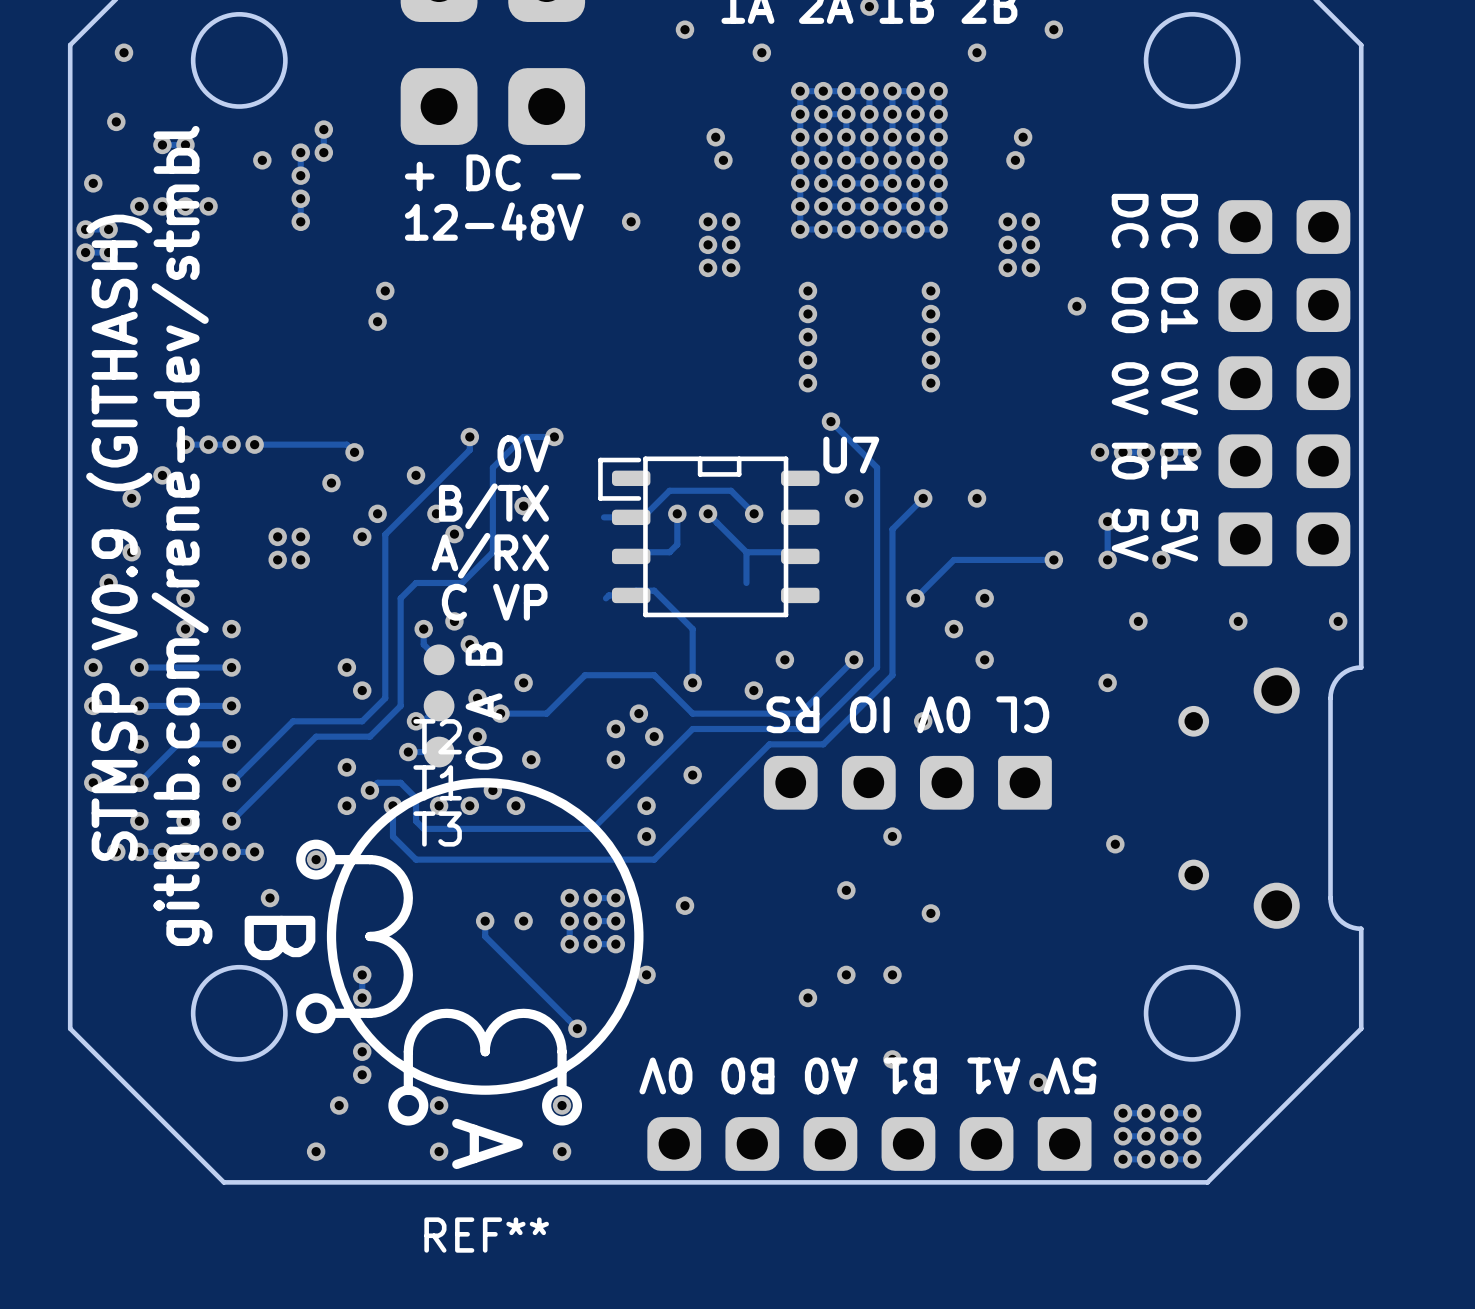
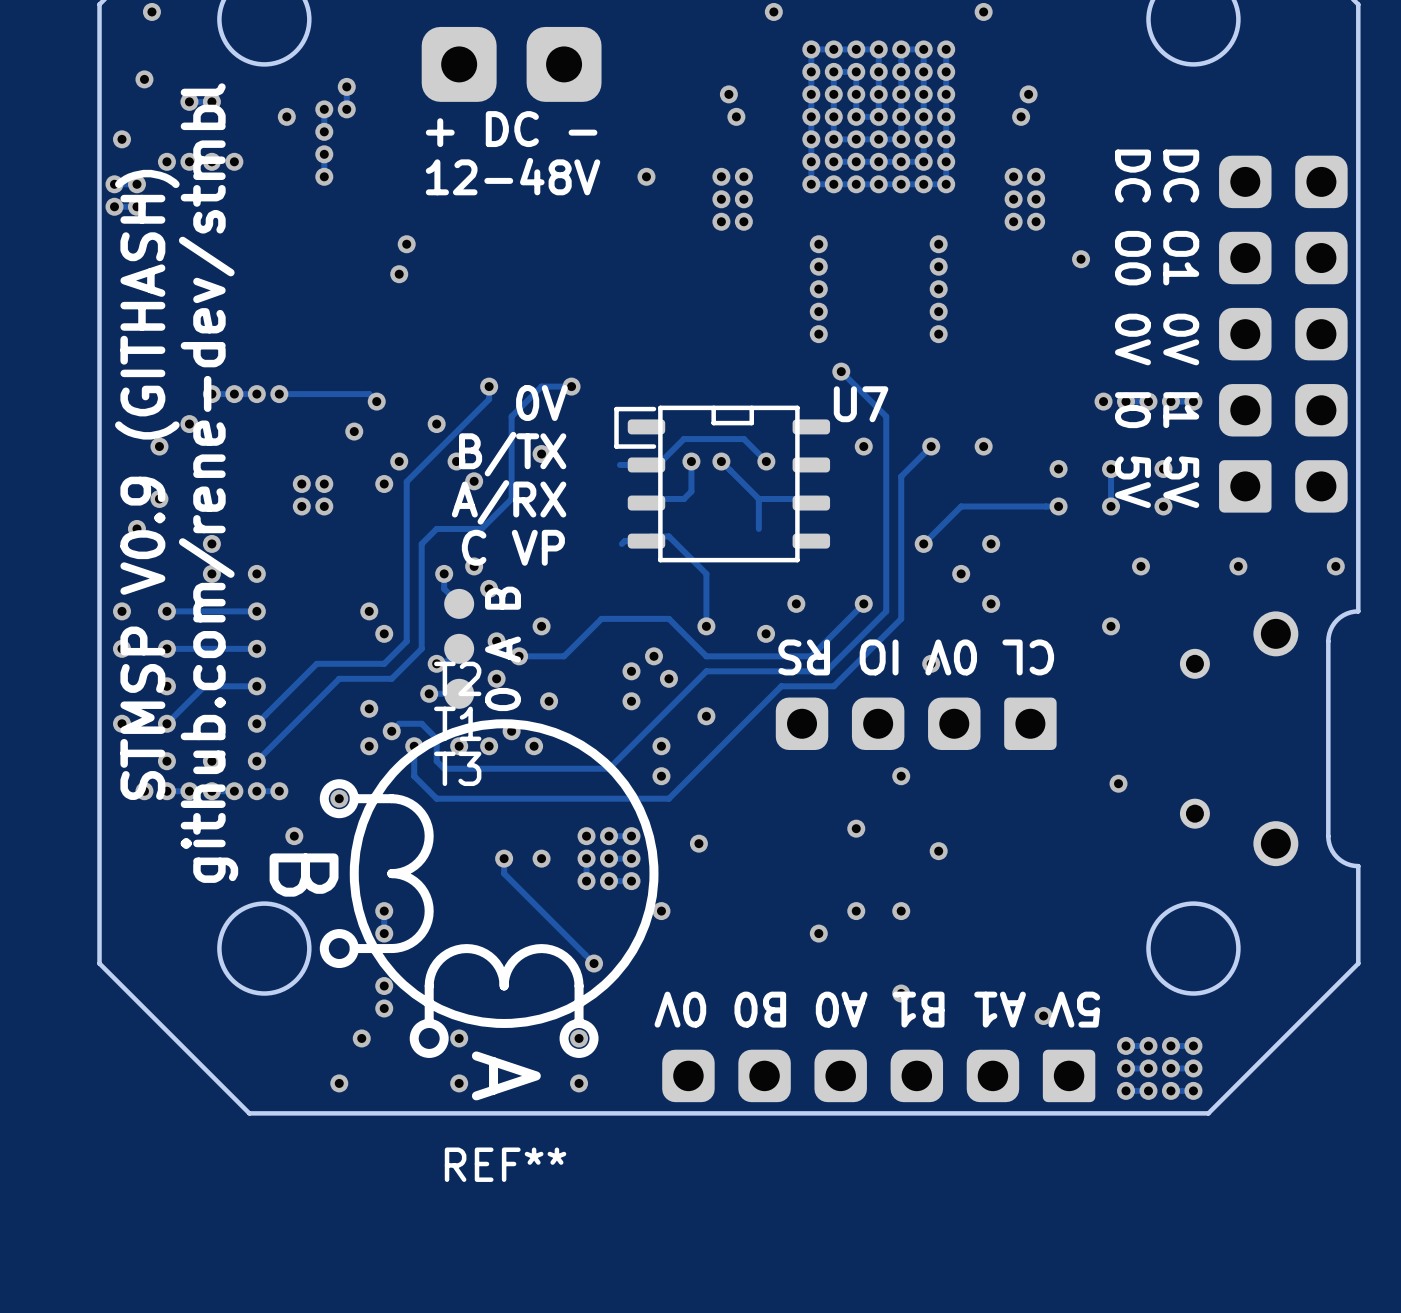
via: none -> (1058, 469)
via: none -> (1163, 469)

